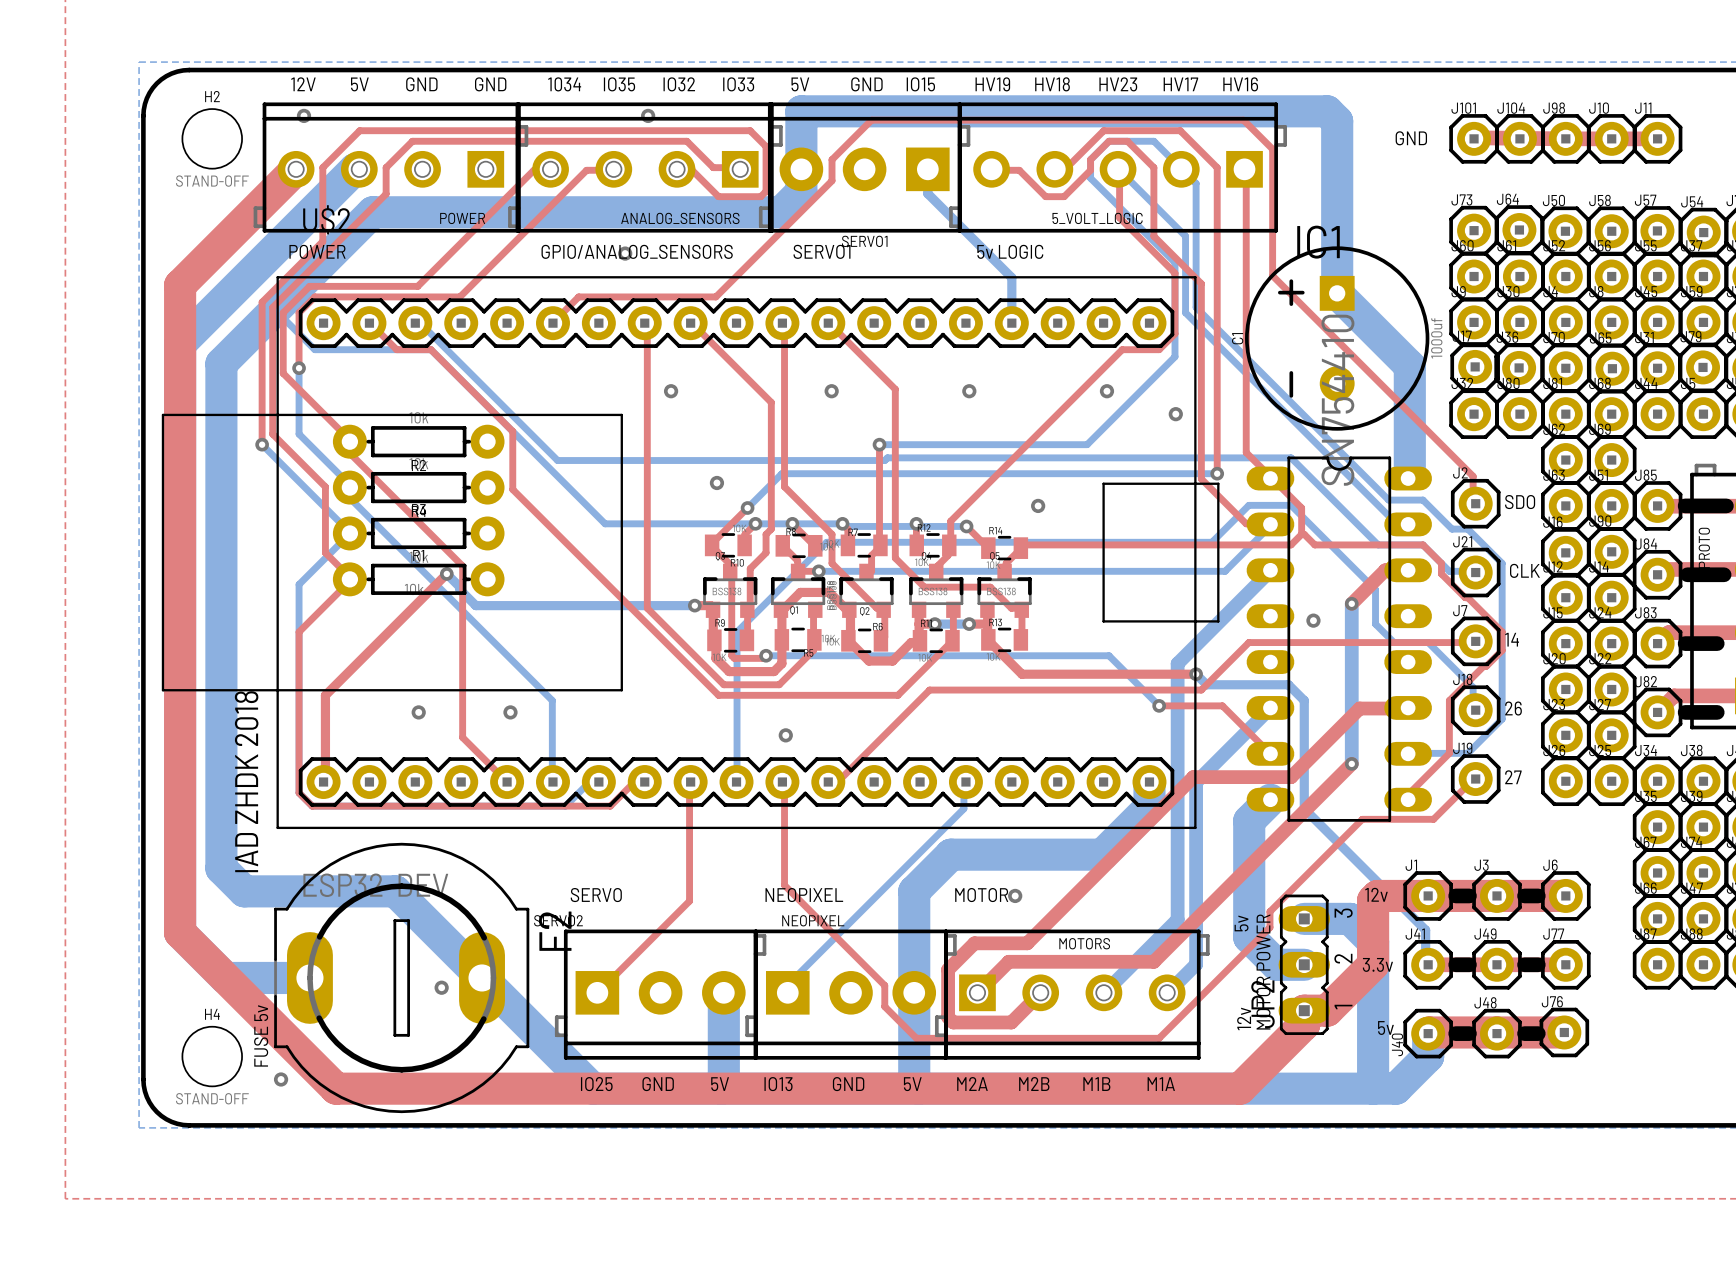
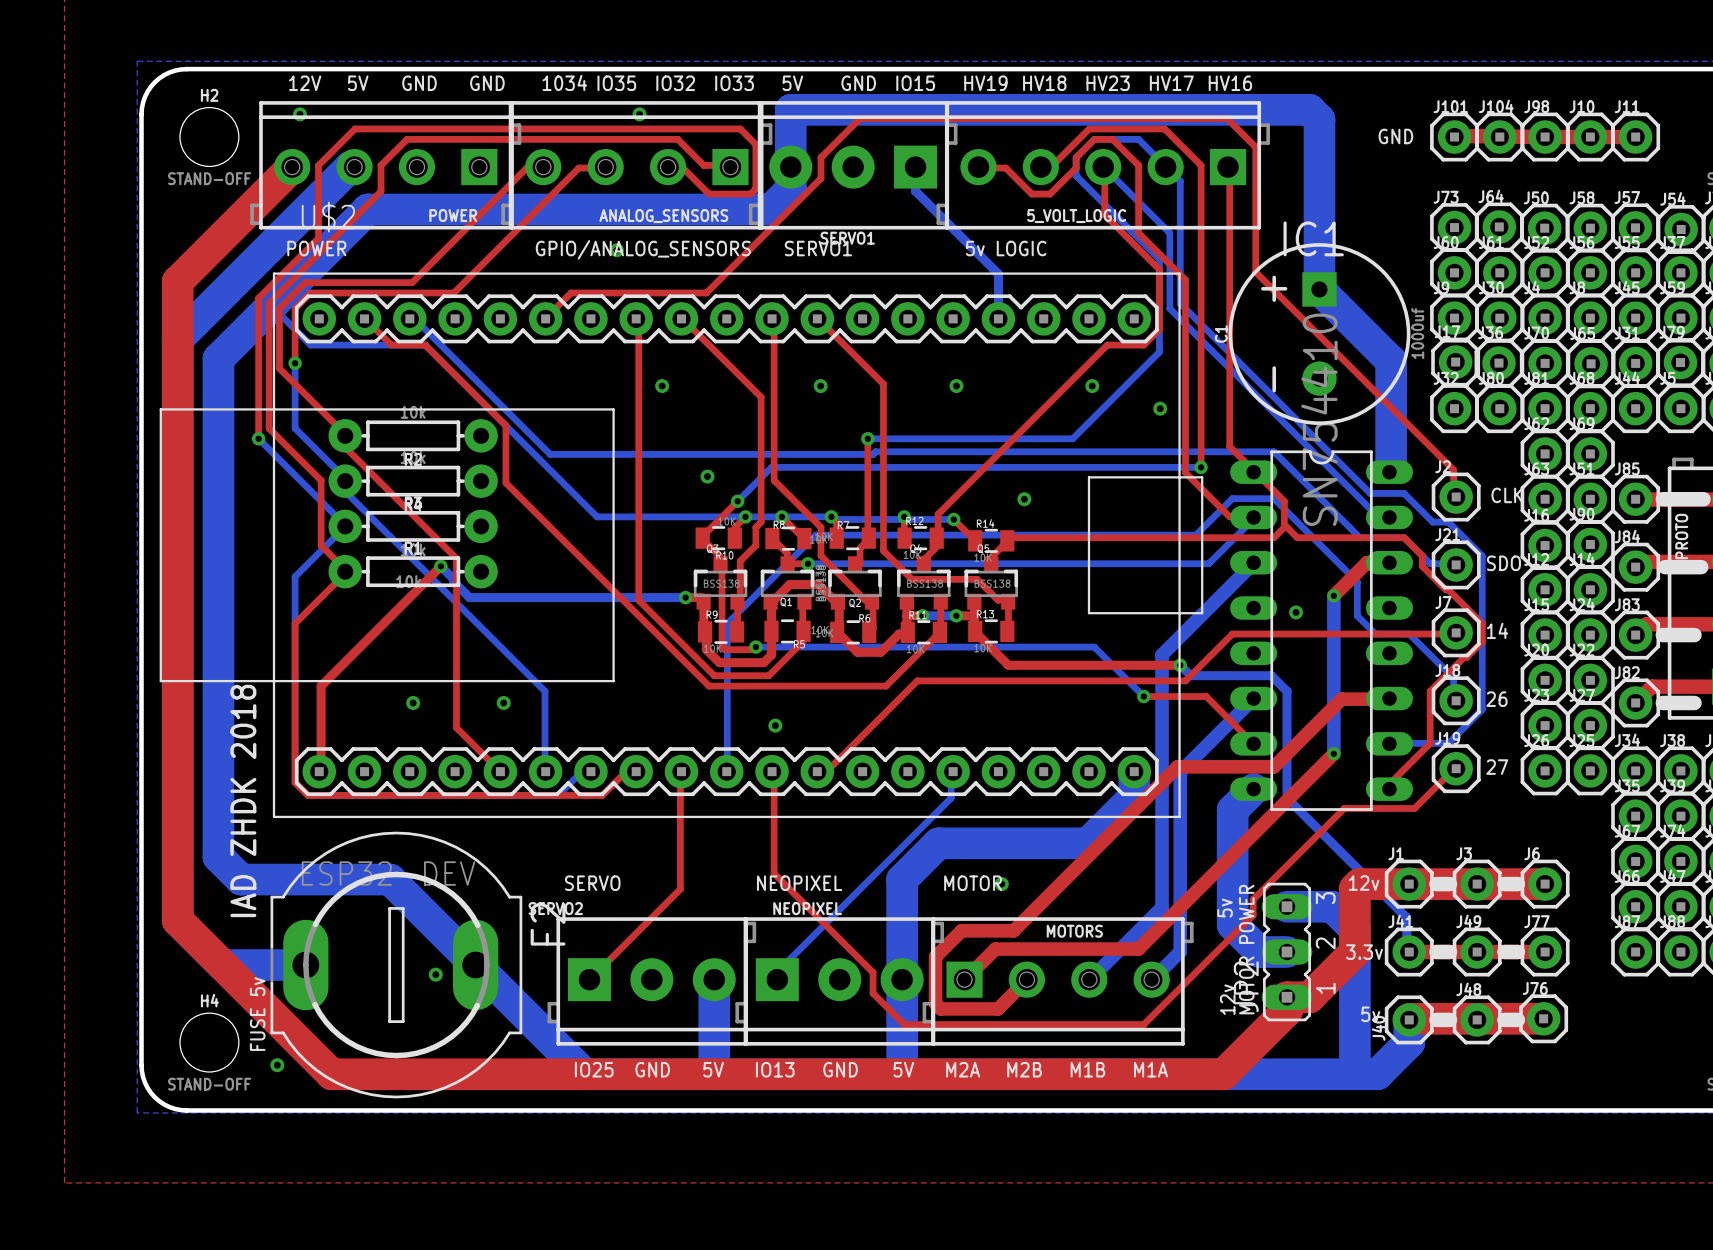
text position: SDO (1520, 502) -> SDO (1503, 563)
text position: CLK (1524, 570) -> CLK (1507, 495)

